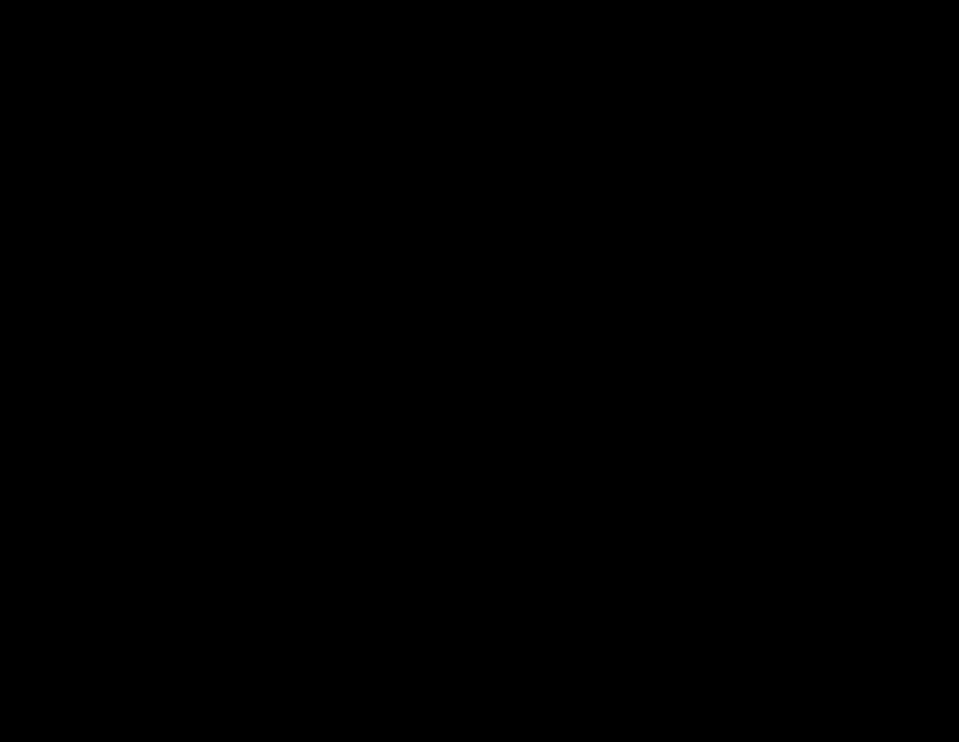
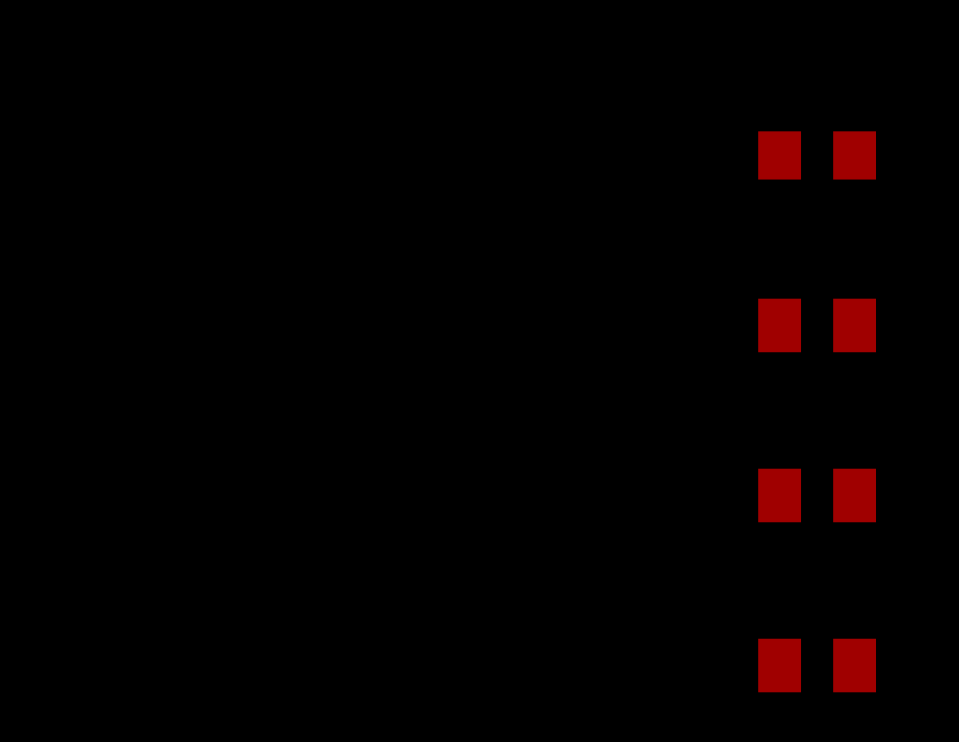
part: none -> (817, 155)
part: none -> (817, 325)
part: none -> (817, 495)
part: none -> (817, 665)

